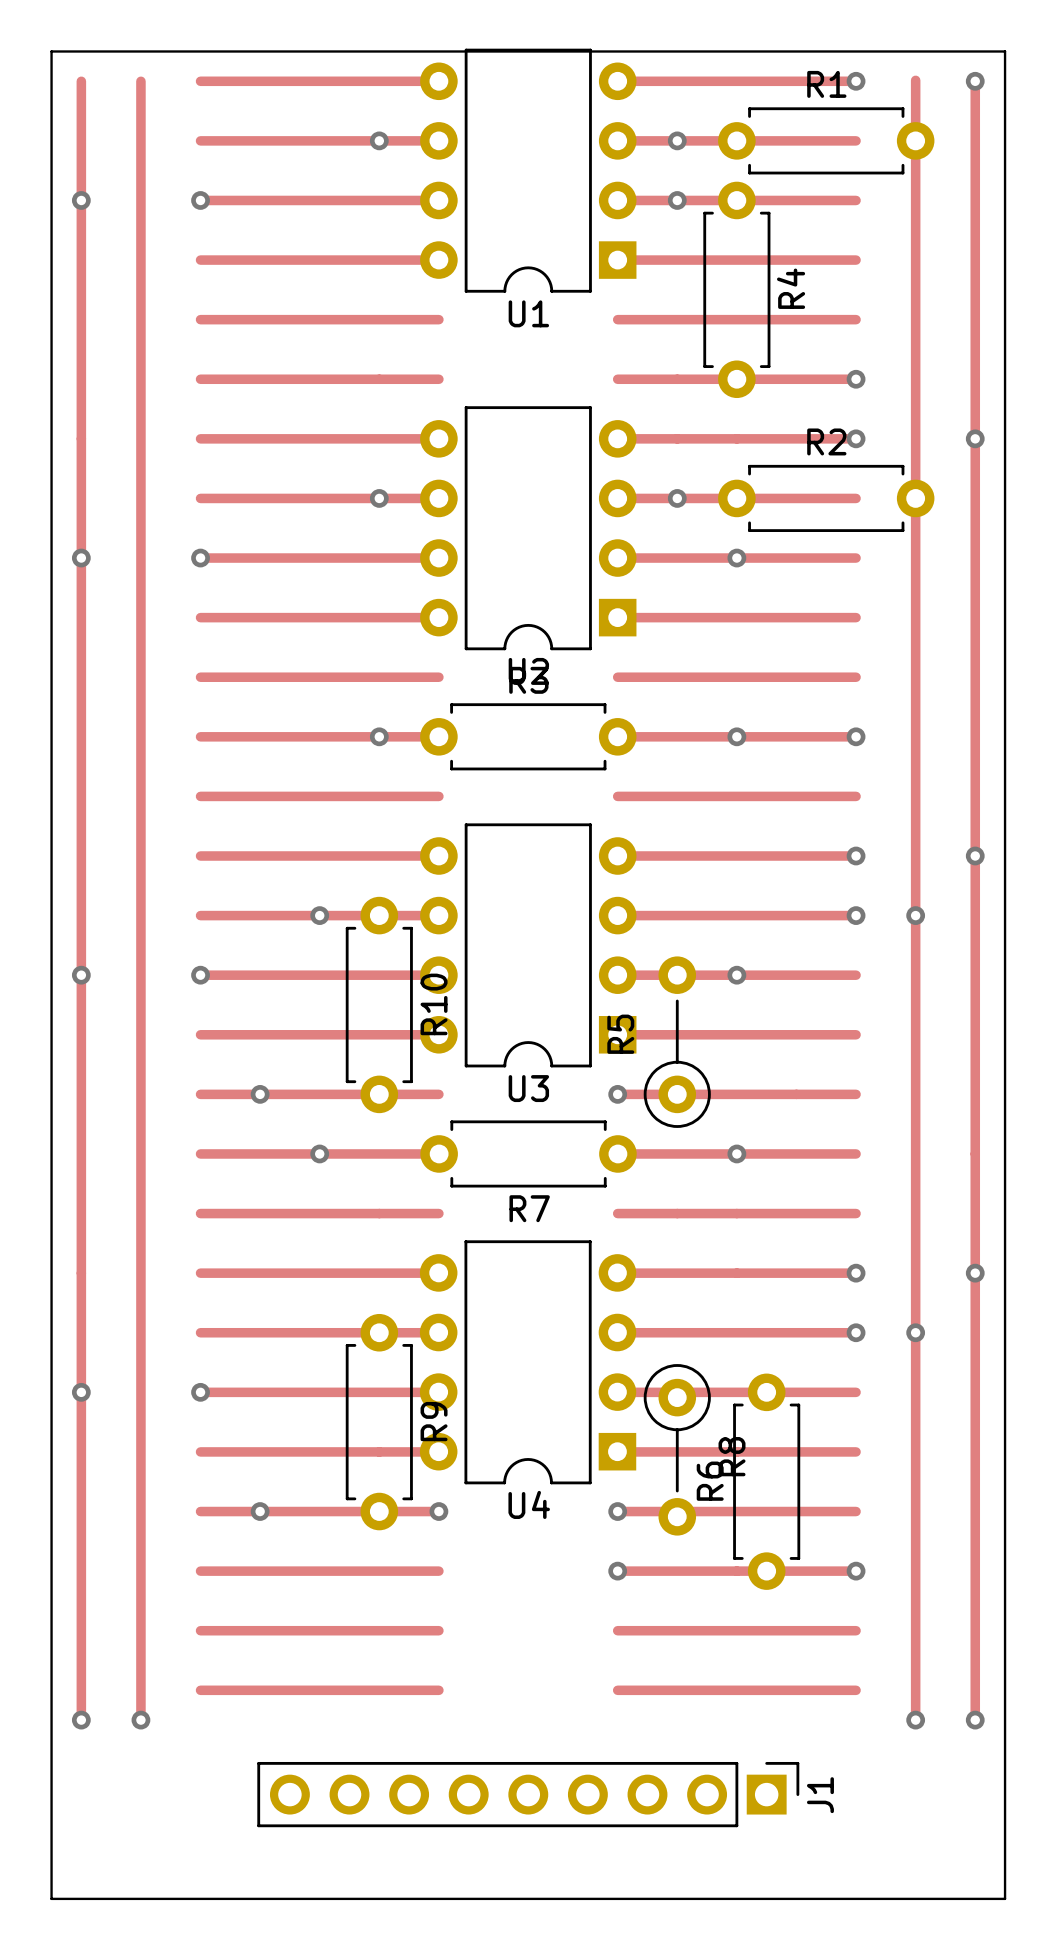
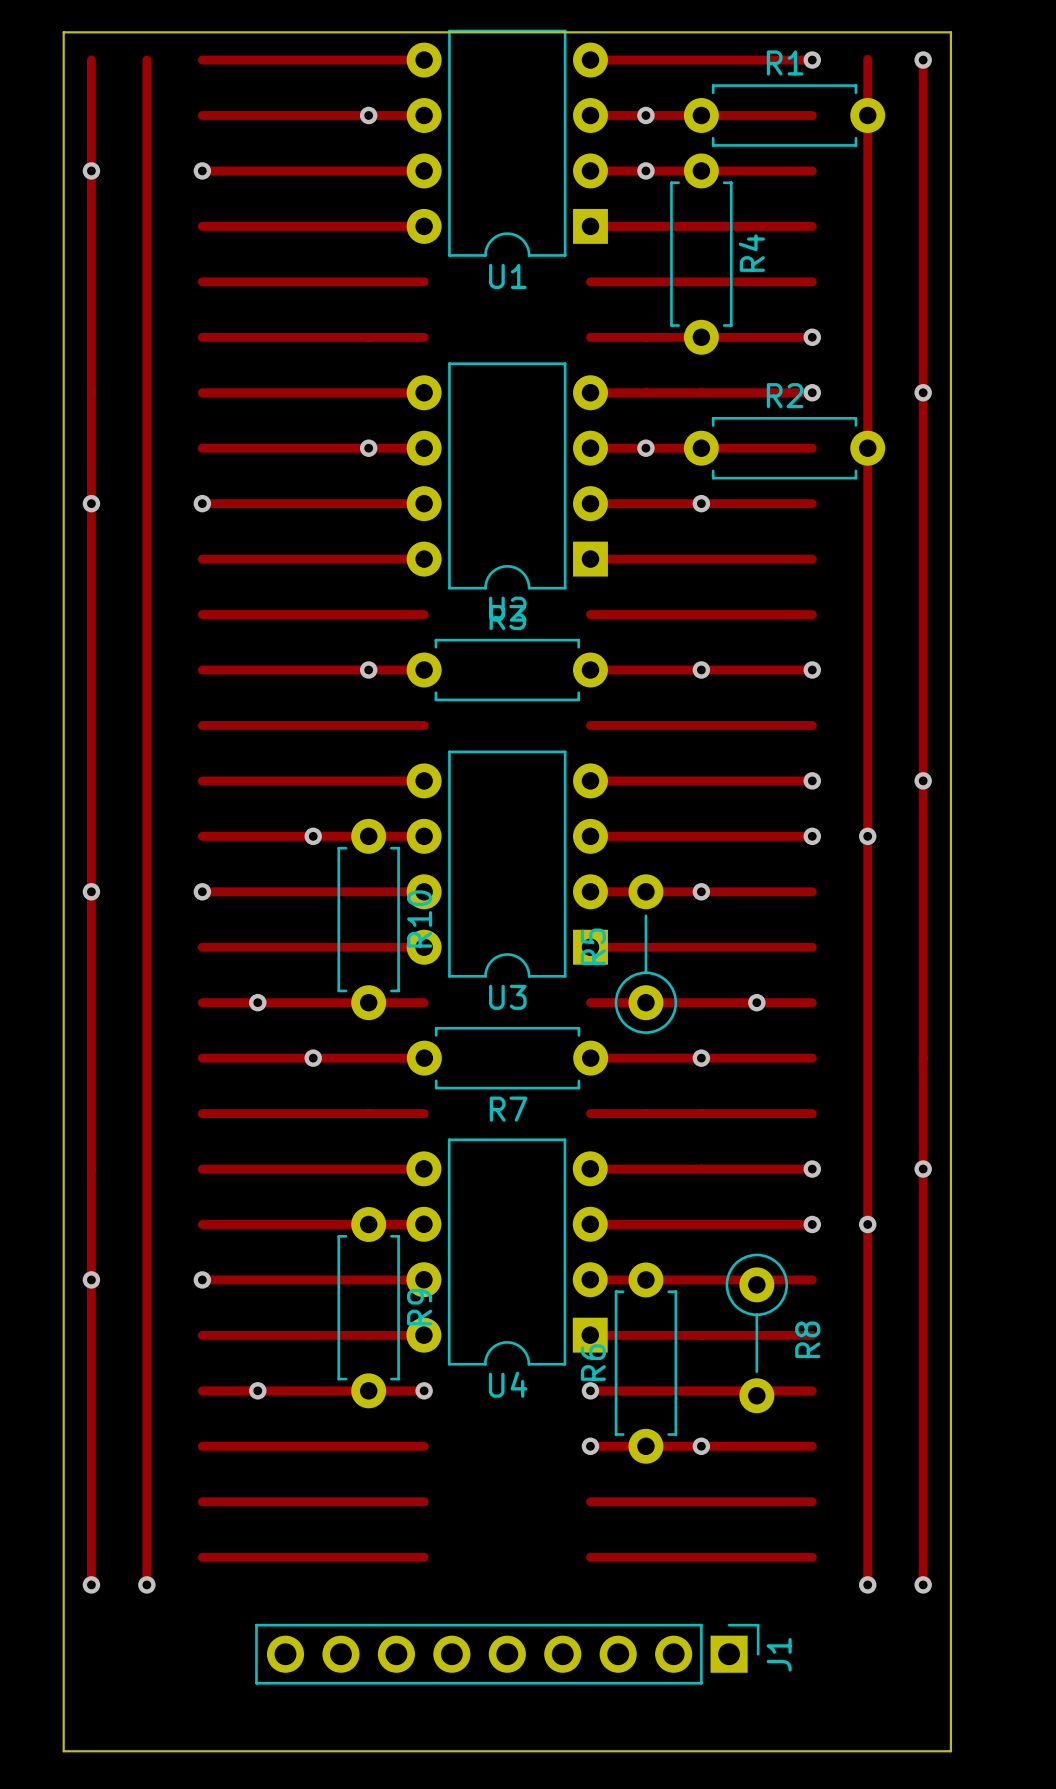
via: (617, 1094) -> none
via: none -> (756, 1002)
R8 position: (677, 1449) -> (756, 1333)
R6 position: (766, 1481) -> (645, 1363)
via position: (856, 1571) -> (701, 1446)

